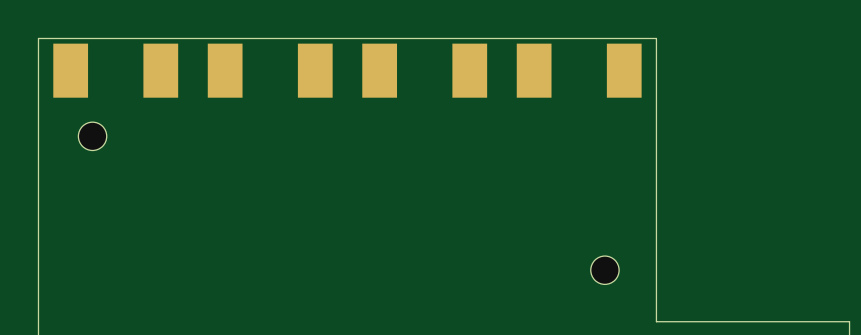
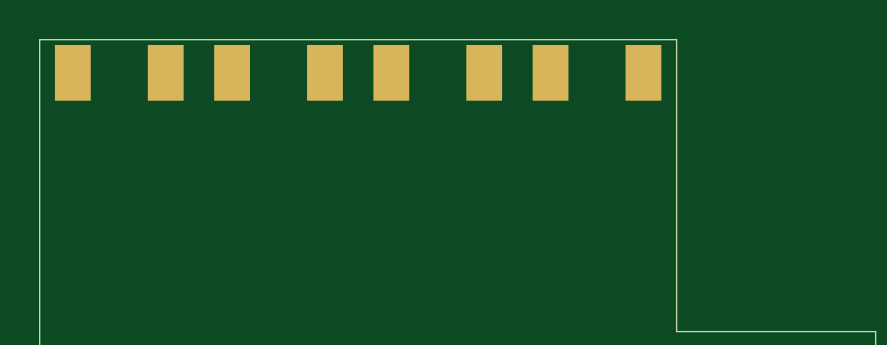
part: (92, 136) -> none
part: (604, 270) -> none

